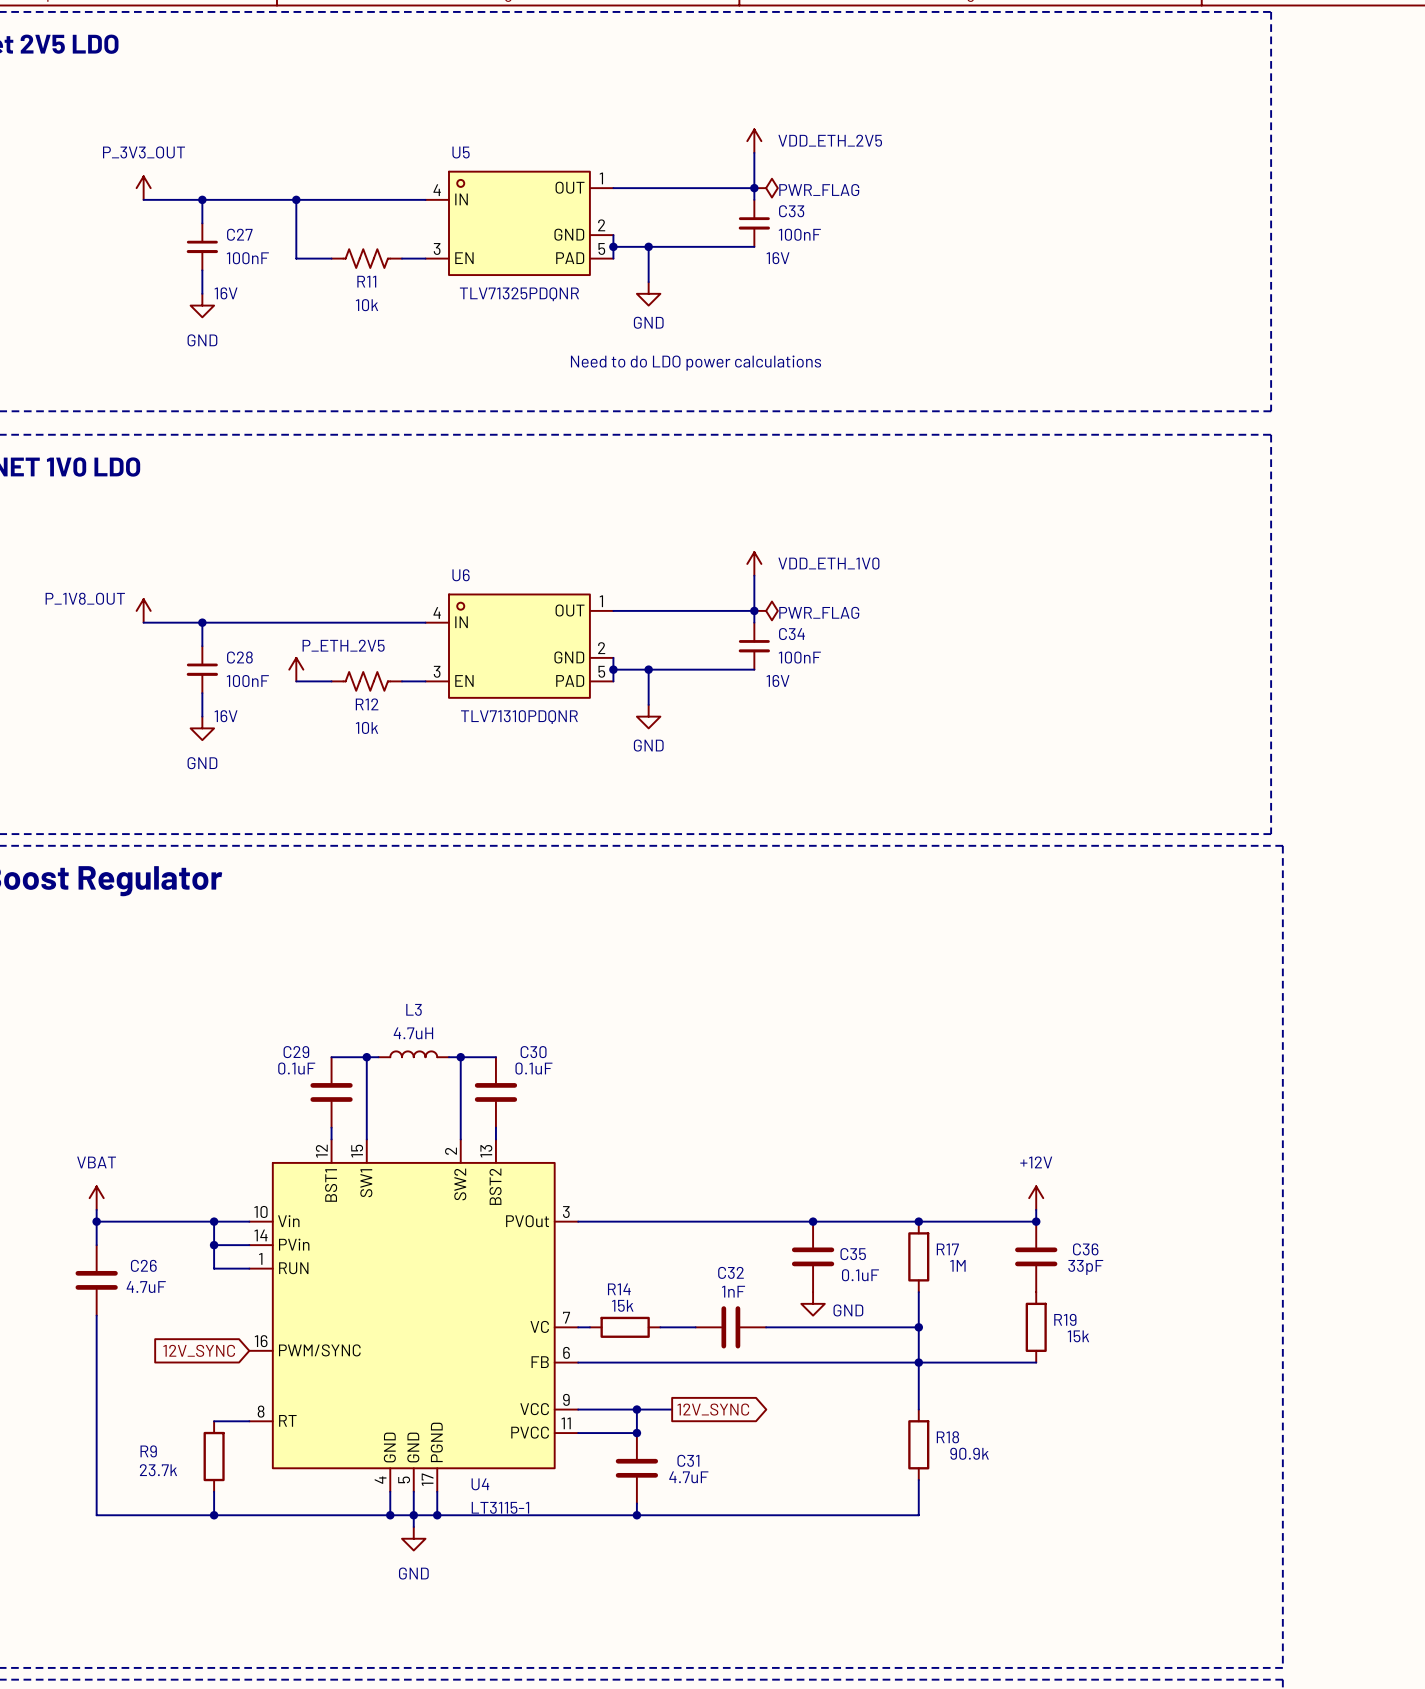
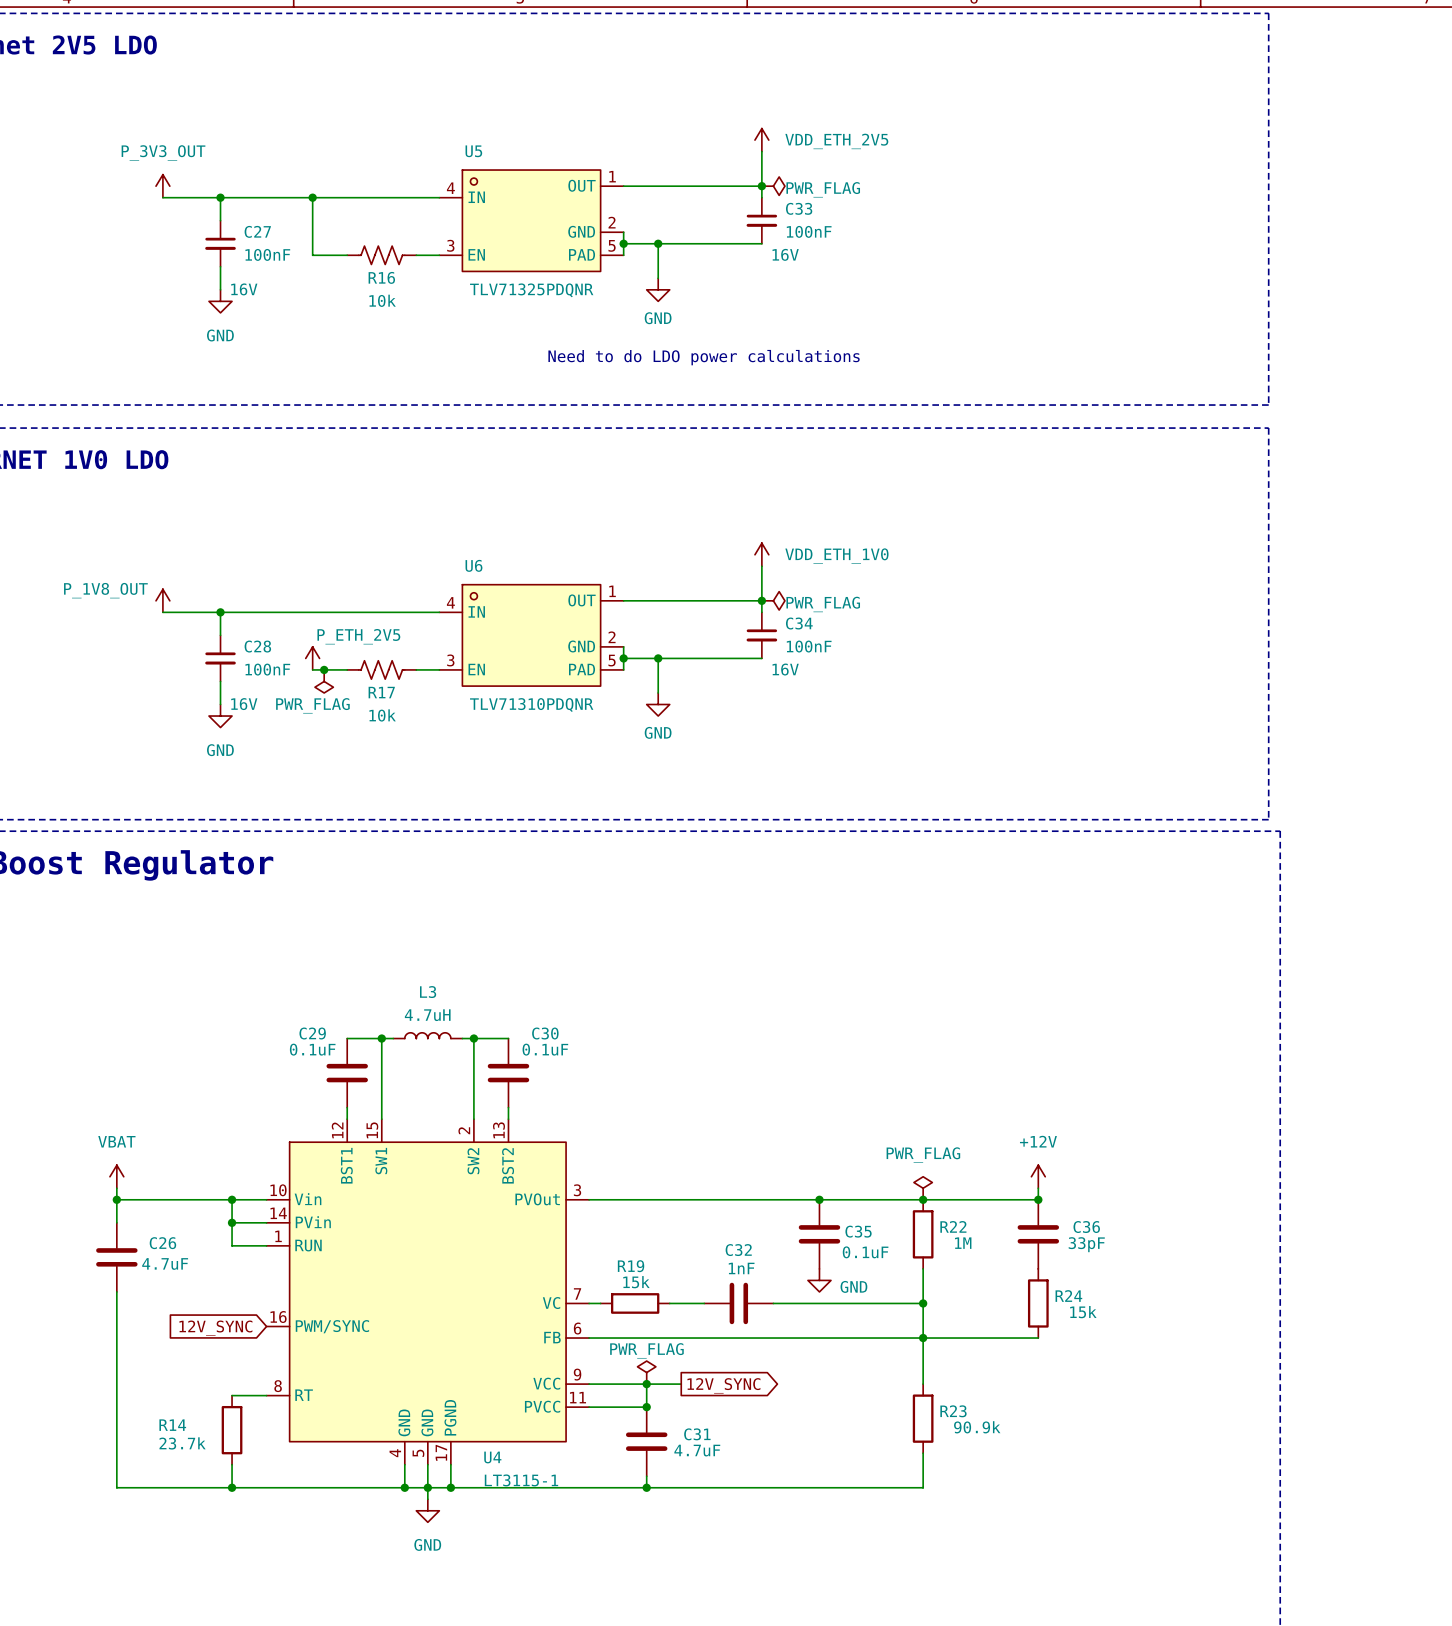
R11 name: R11 (366, 281) -> R16 (381, 277)
junction: none -> (324, 669)
power symbol: none -> PWR_FLAG (324, 681)
R12 name: R12 (367, 704) -> R17 (381, 692)
power symbol: none -> PWR_FLAG (923, 1188)
R17 name: R17 (947, 1249) -> R22 (953, 1226)
R14 name: R14 (619, 1289) -> R19 (631, 1266)
R19 name: R19 (1065, 1319) -> R24 (1068, 1296)
power symbol: none -> PWR_FLAG (646, 1372)
R18 name: R18 (947, 1437) -> R23 (953, 1411)
R9 name: R9 (148, 1451) -> R14 (172, 1425)

